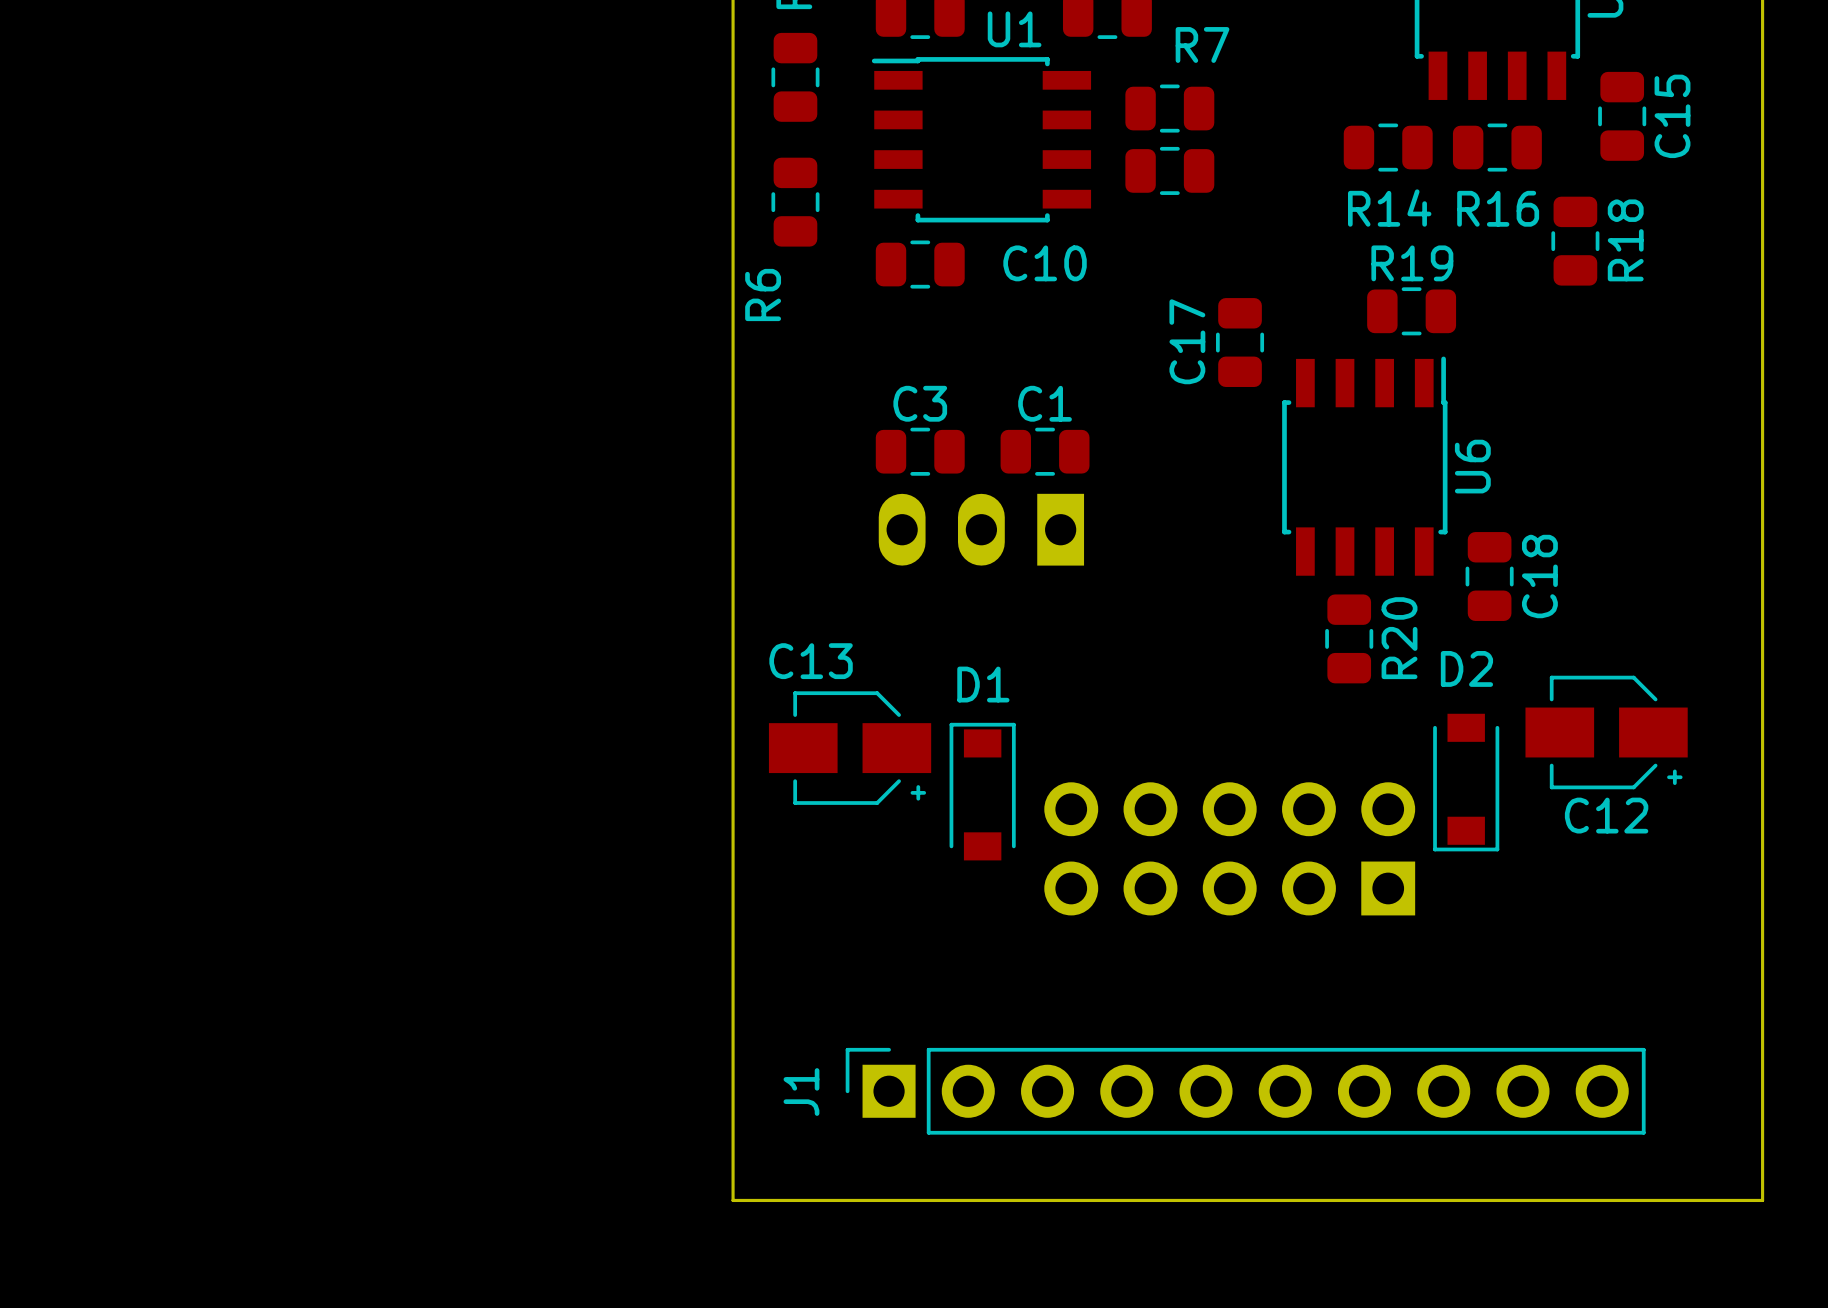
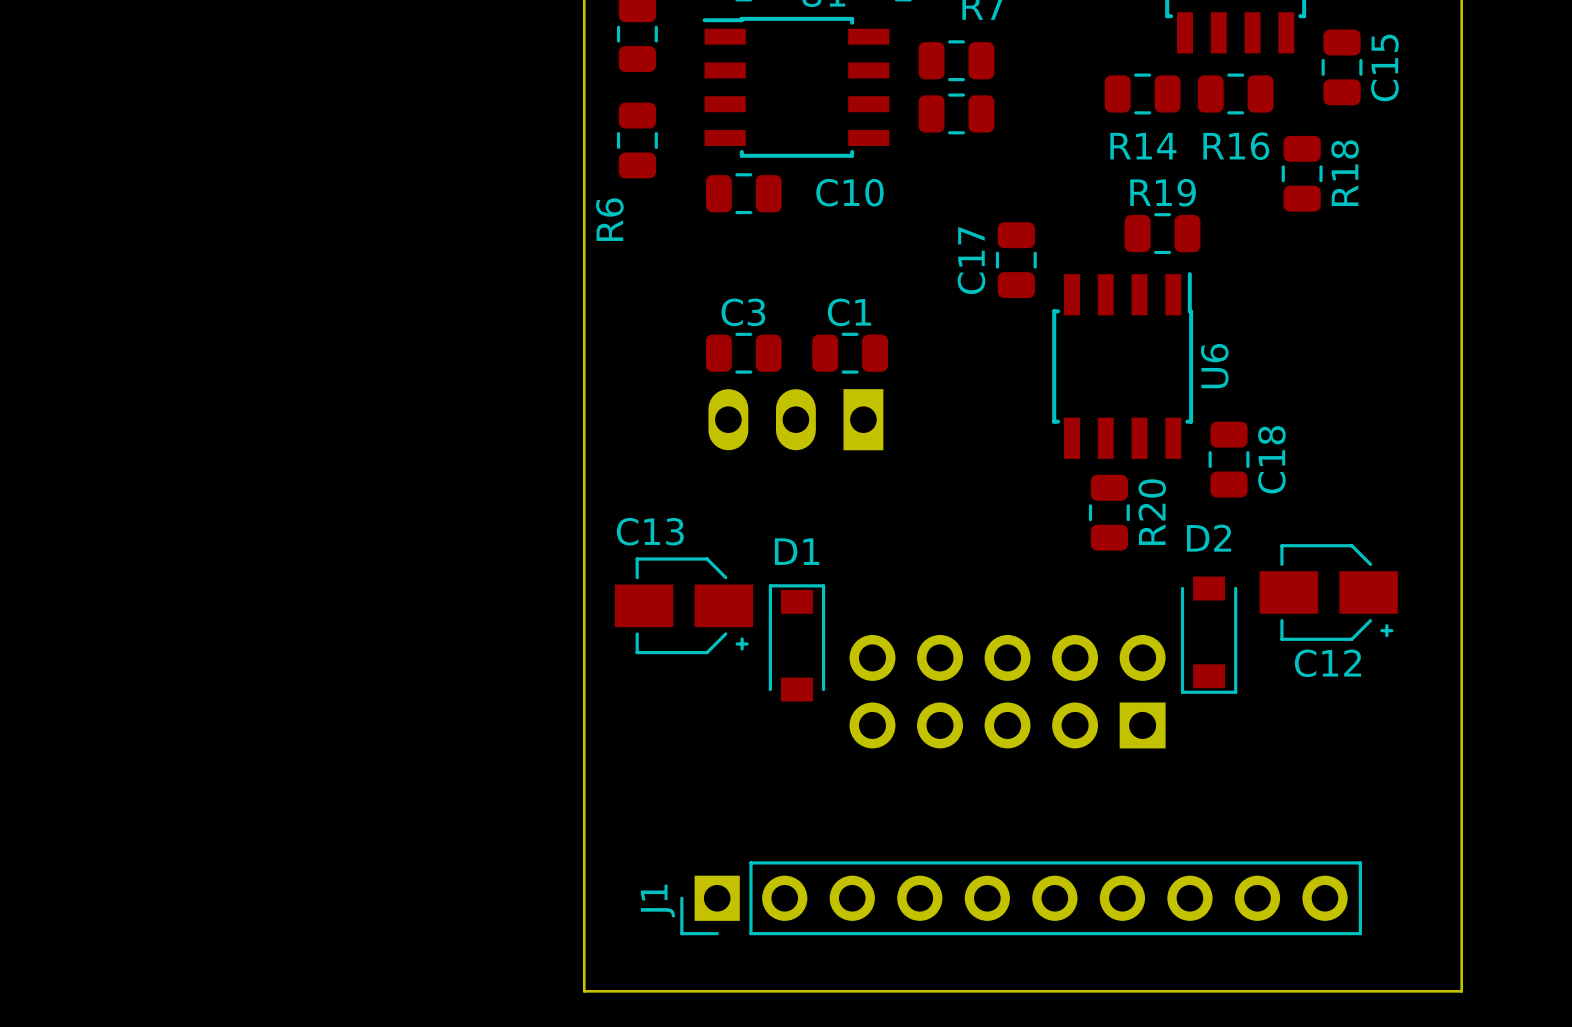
J1 footprint: [845, 1047, 1646, 1135] -> [680, 861, 1362, 936]

